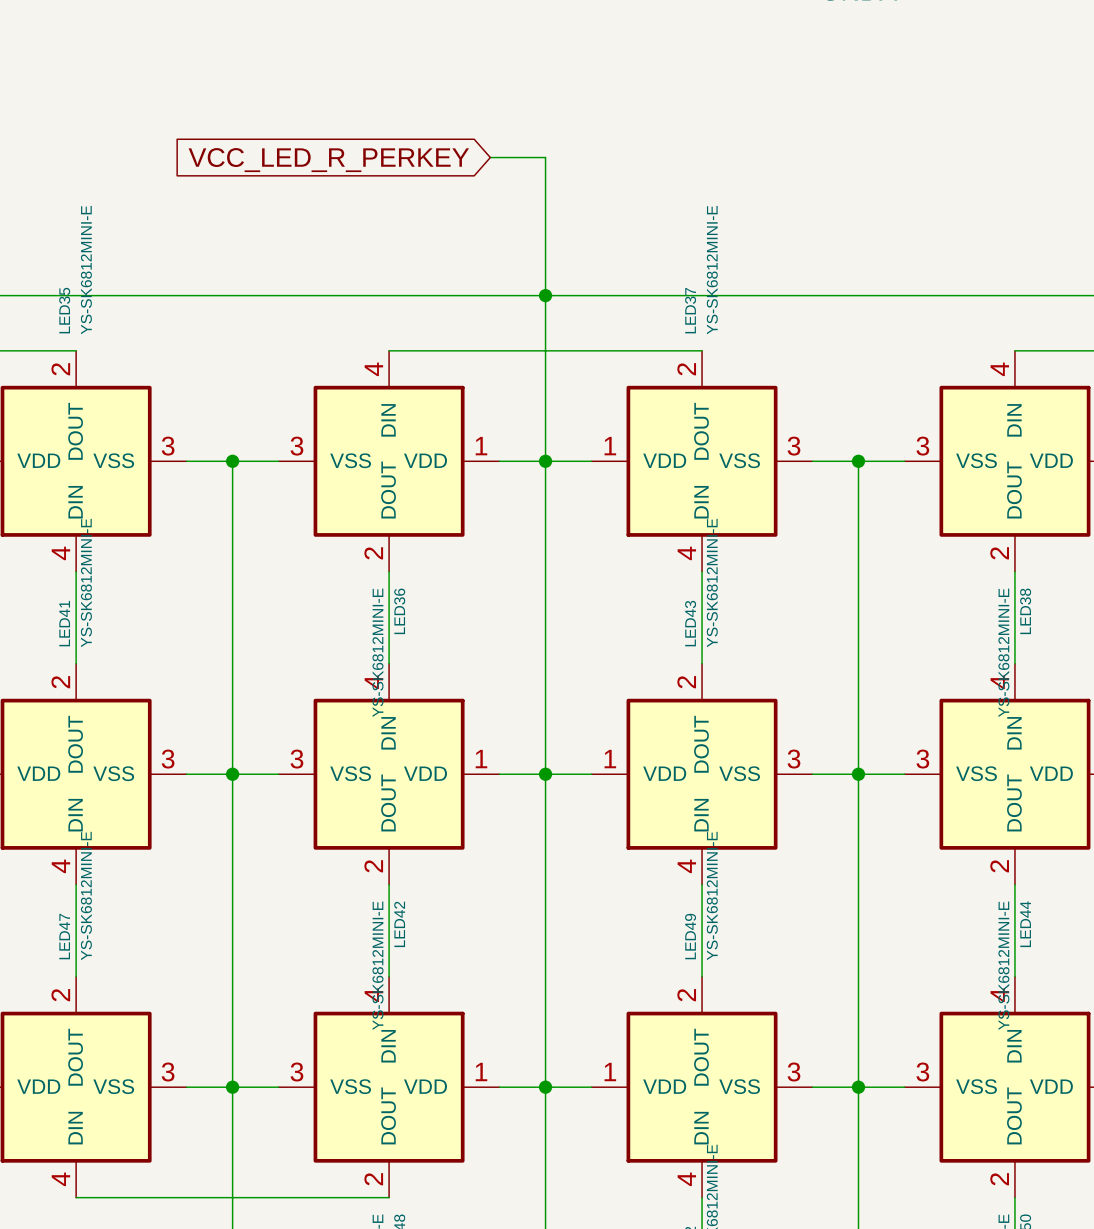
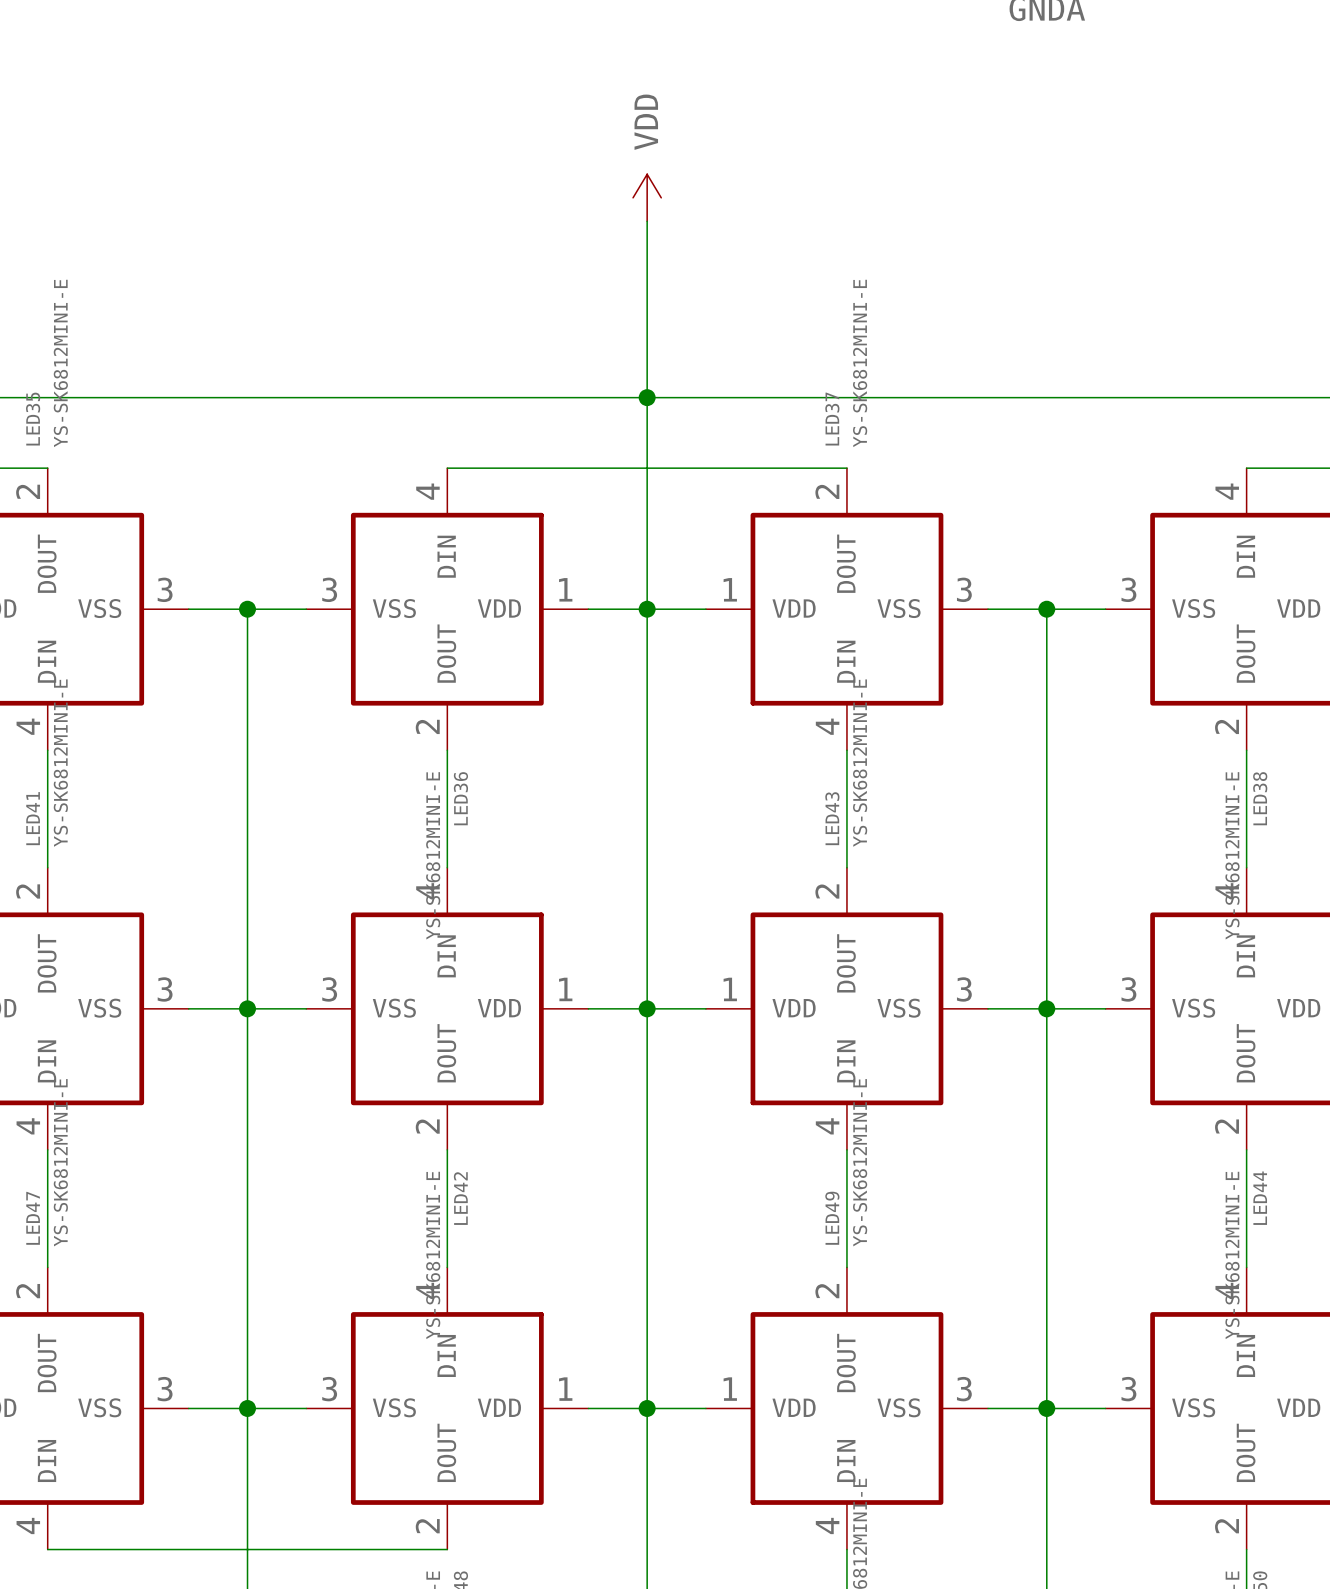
power symbol: none -> VDD (647, 197)
wire: (490, 157) (545, 157) -> none
global label: VCC_LED_R_PERKEY (328, 160) -> none

